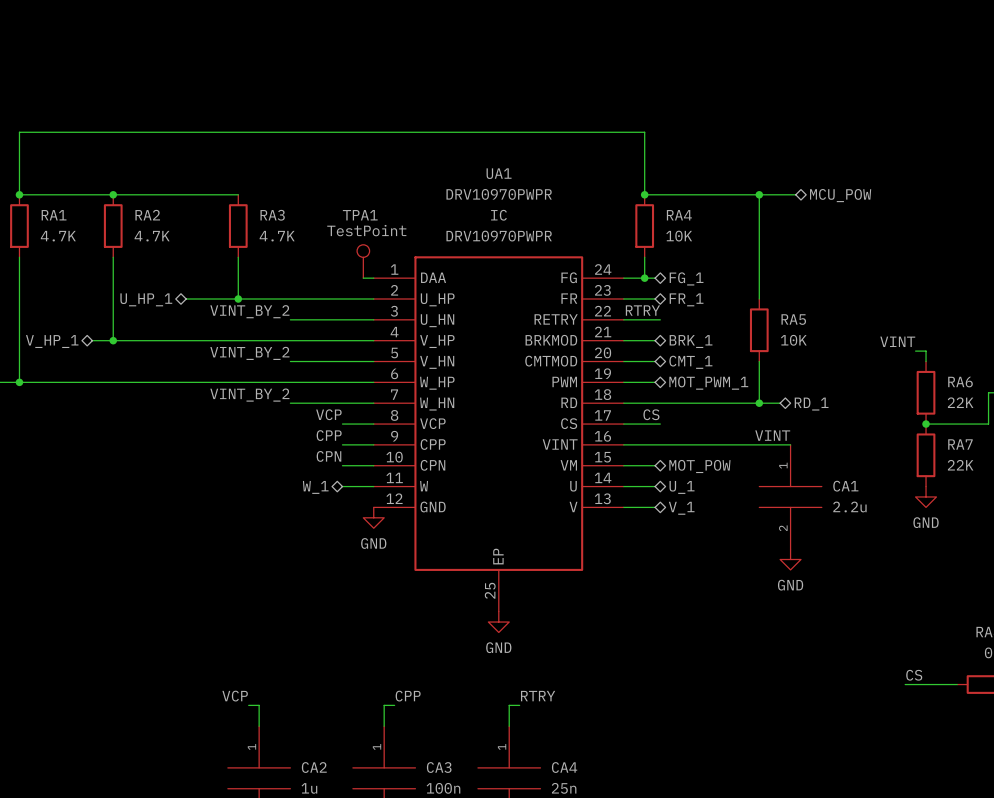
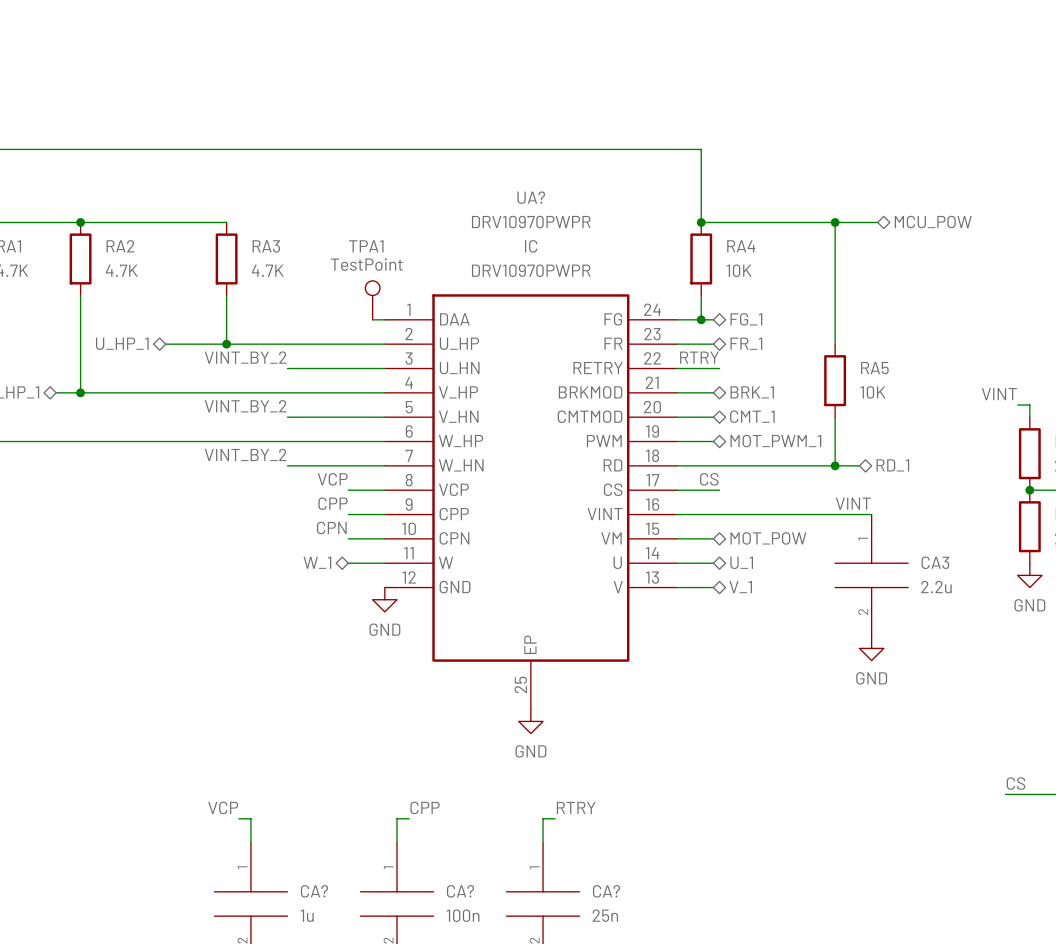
UA1 name: UA1 (499, 173) -> UA? (531, 197)
CA1 name: CA1 (845, 486) -> CA3 (935, 562)
CA2 name: CA2 (314, 767) -> CA? (314, 891)
CA3 name: CA3 (439, 767) -> CA? (460, 891)
CA4 name: CA4 (564, 767) -> CA? (606, 891)

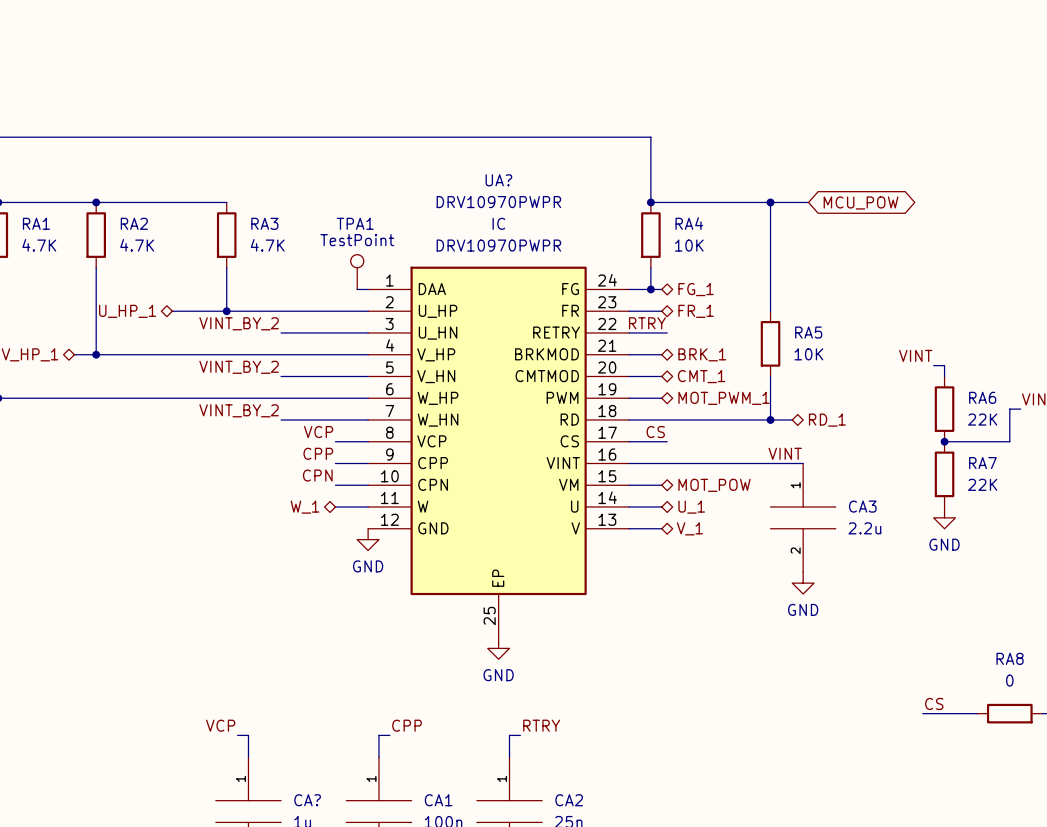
global label: none -> MCU_POW (861, 202)
hierarchical label: MCU_POW (933, 222) -> none
CA? name: CA? (460, 891) -> CA1 (438, 800)
CA? name: CA? (606, 891) -> CA2 (569, 800)

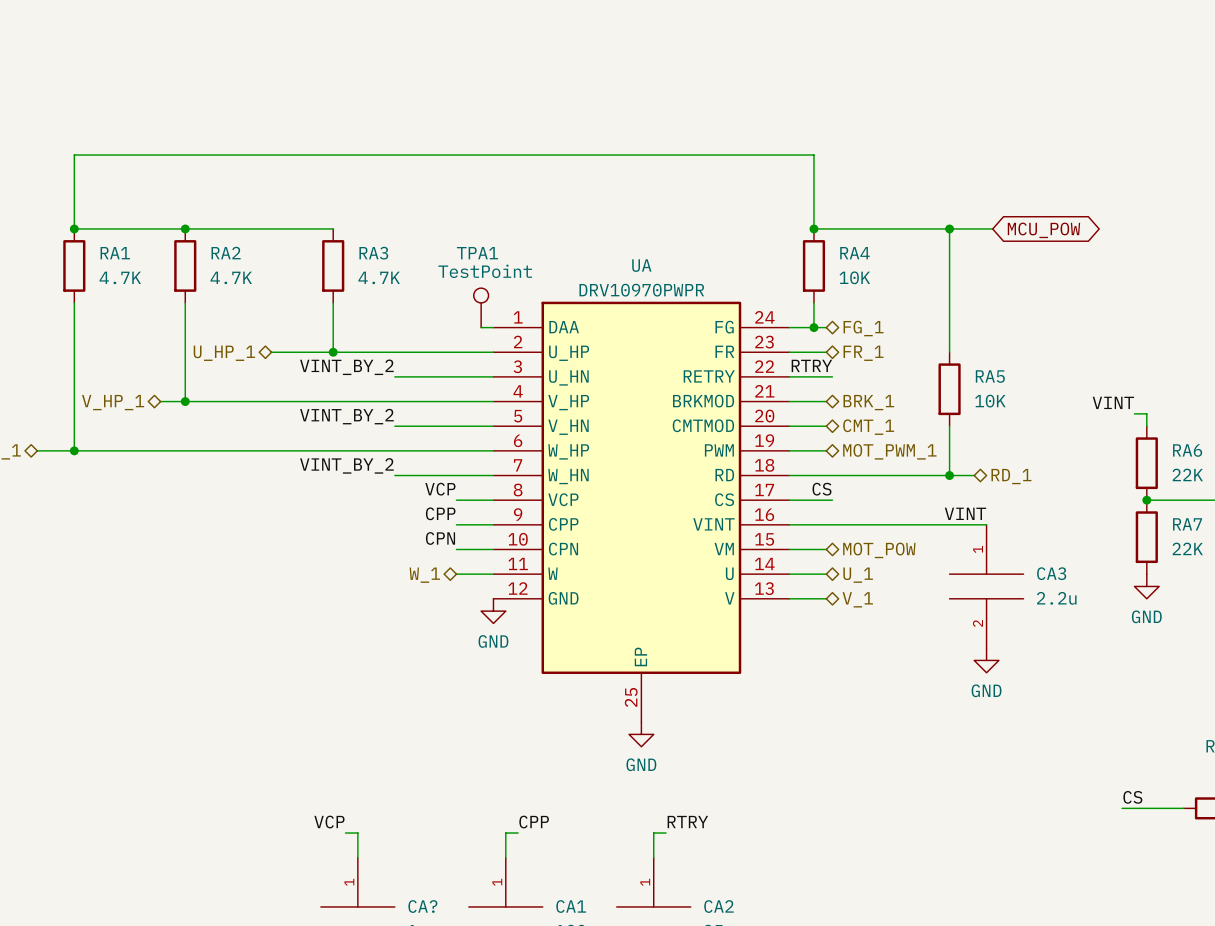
UA? name: UA? (498, 180) -> UA (641, 265)
UA? value position: DRV10970PWPR (498, 202) -> DRV10970PWPR (641, 290)
UA? text: IC (498, 223) -> none
UA? text: DRV10970PWPR (498, 245) -> none

